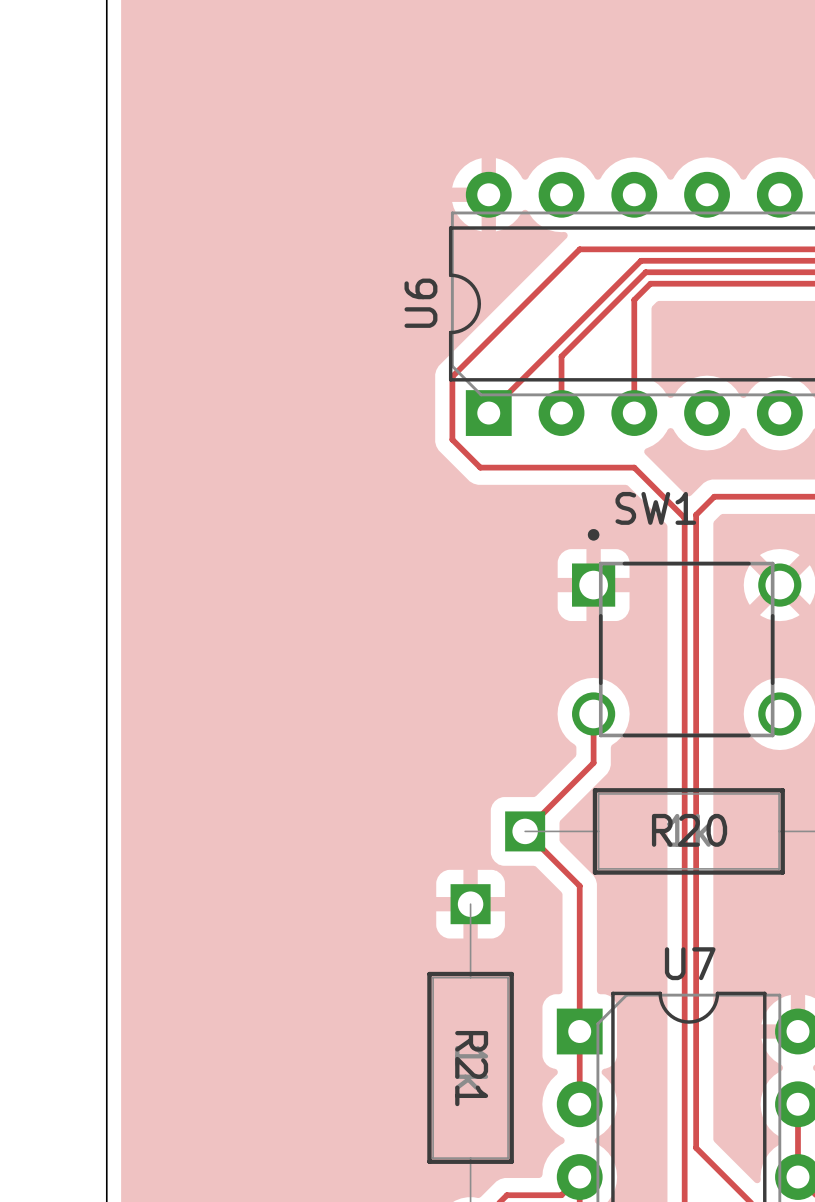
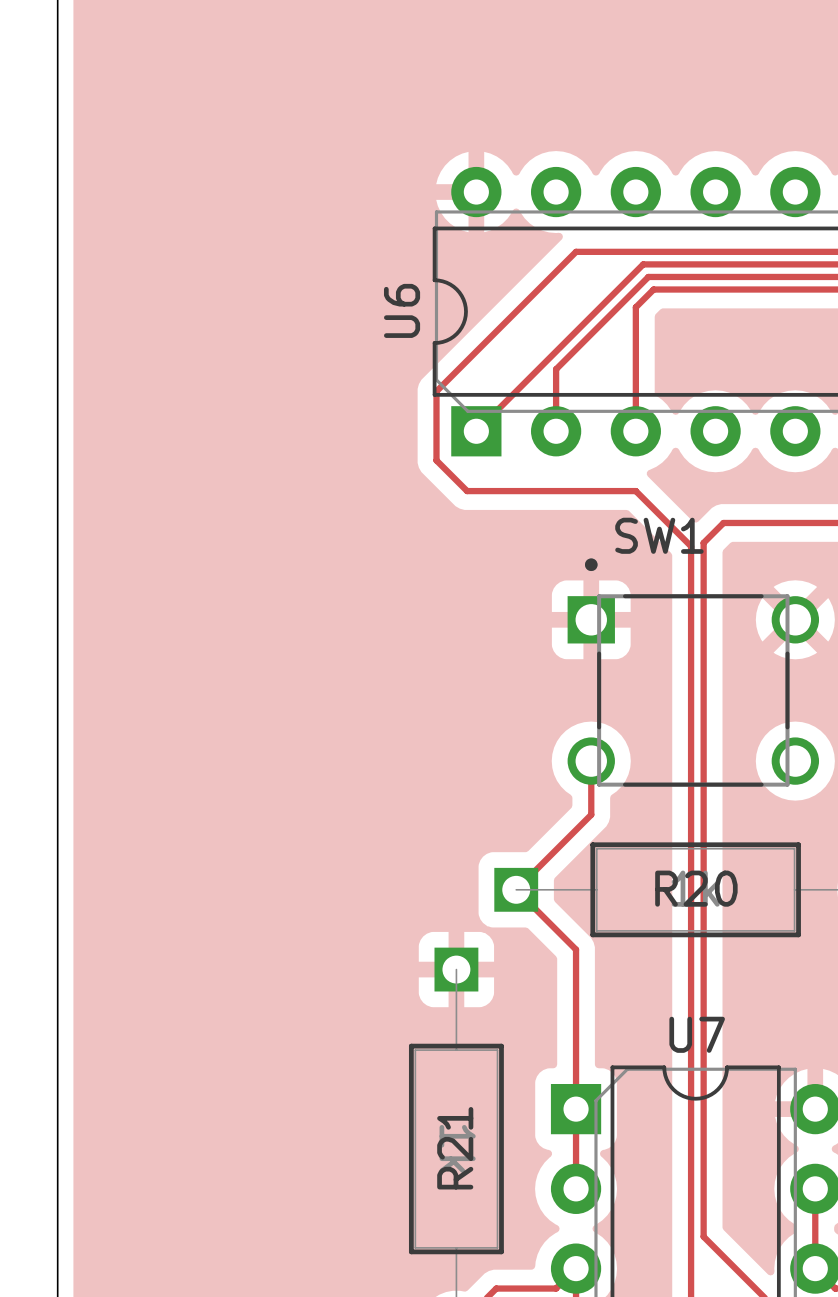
R21 name rotation: 0° (471, 1068) -> 180° (455, 1148)

